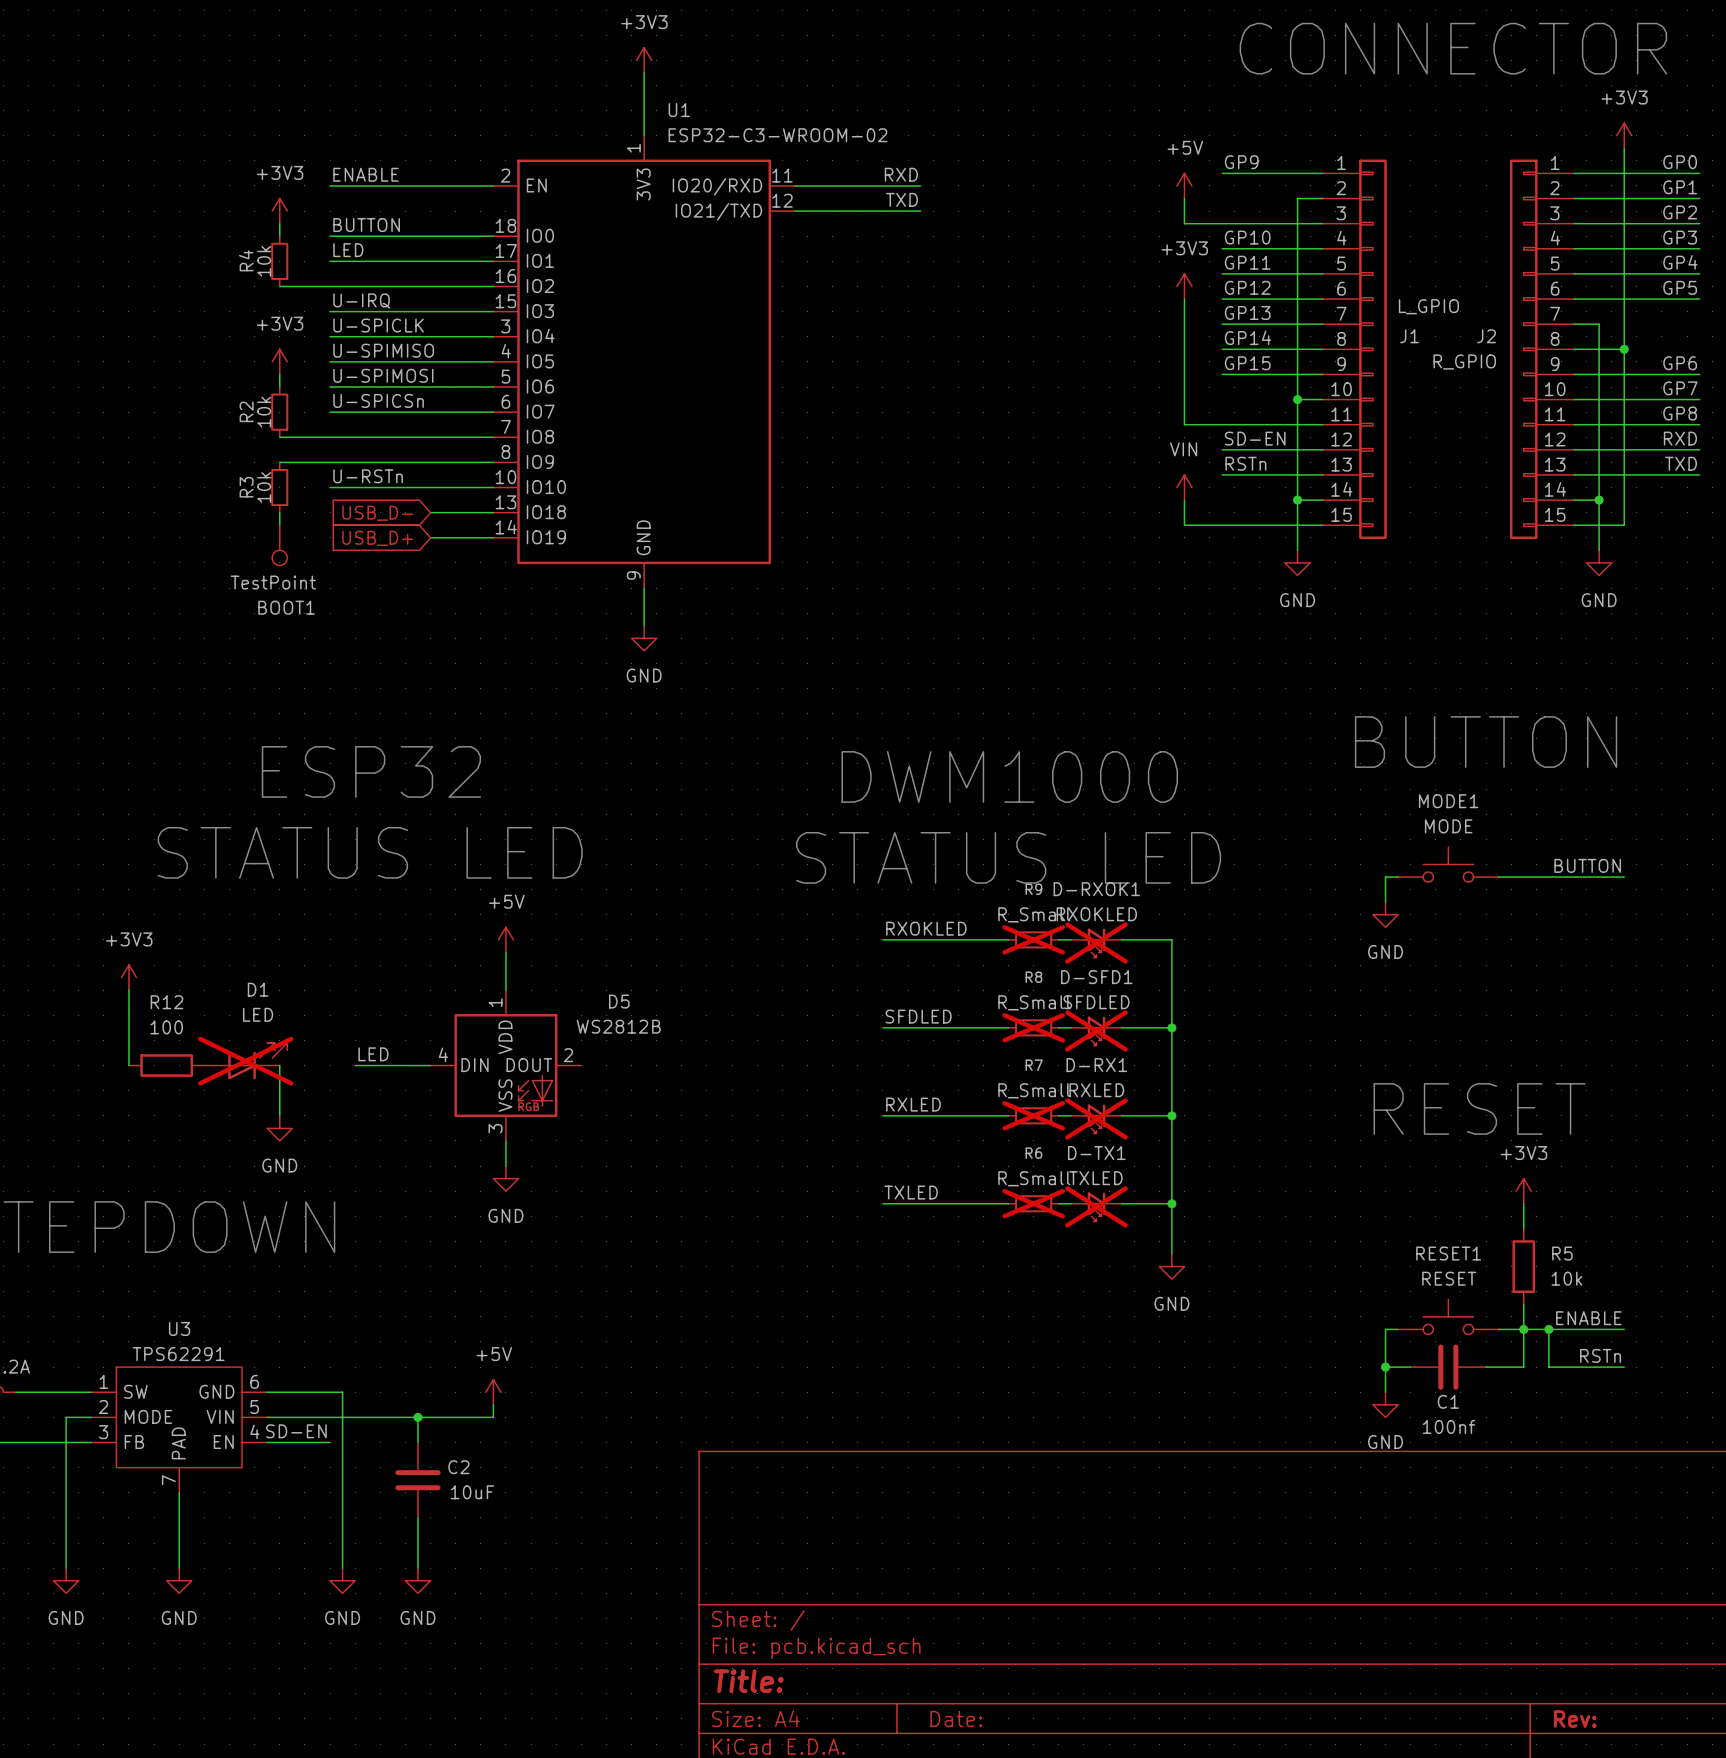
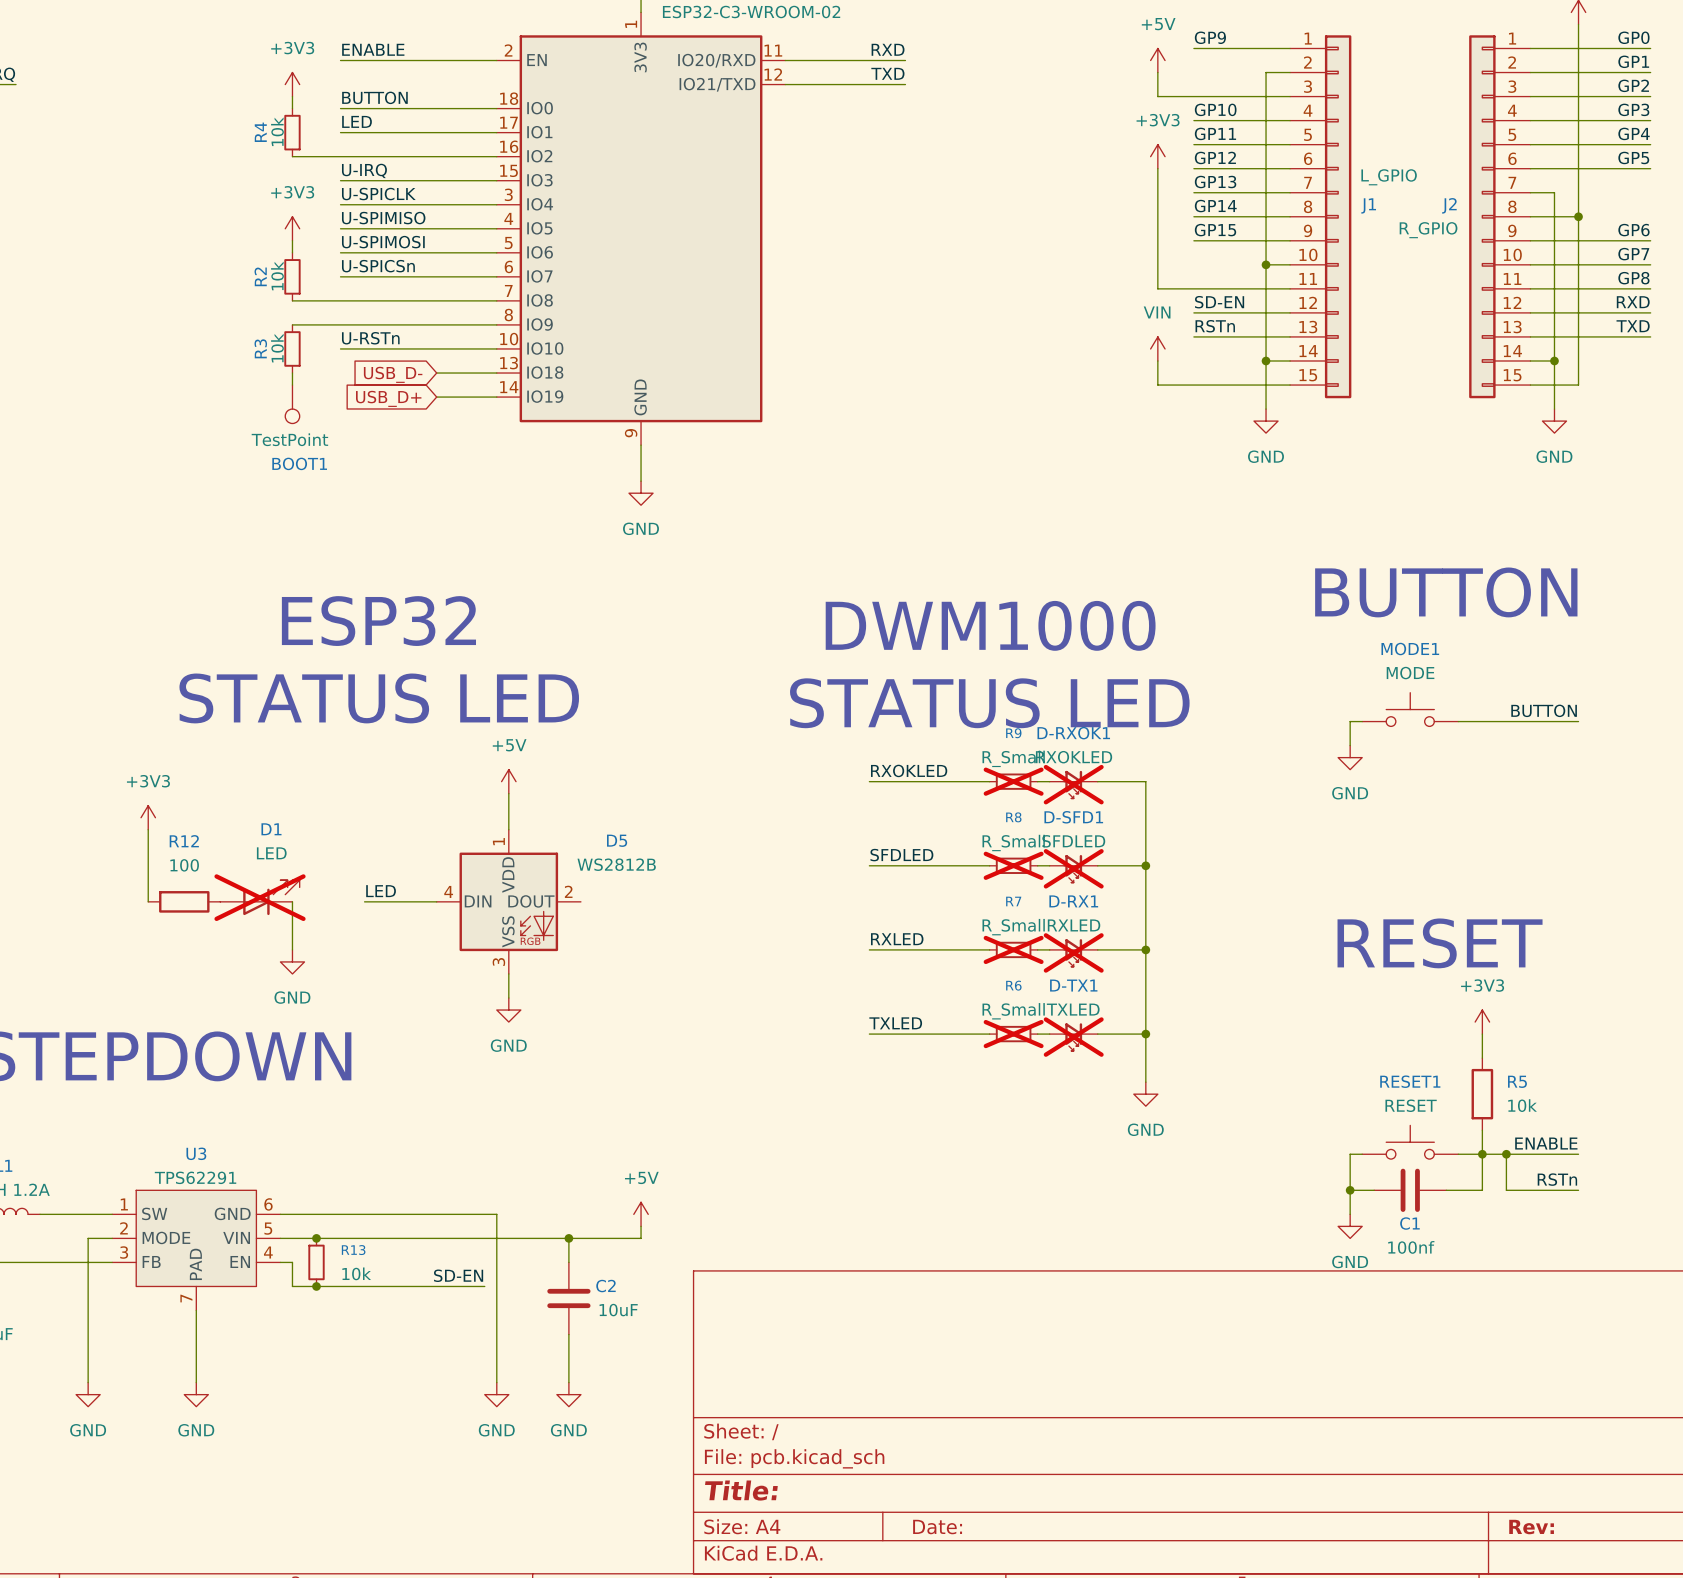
wire: (342, 1392) (342, 1568) -> (352, 1214) (496, 1214) (496, 1226)
power symbol position: +5V (493, 1392) -> +5V (641, 1214)
wire: none -> (641, 1226) (641, 1238) (496, 1238) (496, 1382)
junction: none -> (316, 1238)
wire: (417, 1417) (417, 1442) -> (568, 1238) (568, 1262)
junction: (417, 1417) -> none
junction: none -> (568, 1238)
label position: SD-EN (296, 1431) -> SD-EN (458, 1275)
wire: (279, 1442) (330, 1442) -> (292, 1262) (292, 1286) (484, 1286)
R13: none -> 10k (316, 1262)
junction: none -> (316, 1286)
C2 position: (417, 1480) -> (568, 1298)
wire: (417, 1517) (417, 1568) -> (568, 1334) (568, 1382)
power symbol: GND (342, 1580) -> none
power symbol: GND (417, 1580) -> none
power symbol: none -> GND (496, 1394)
power symbol: none -> GND (568, 1394)

